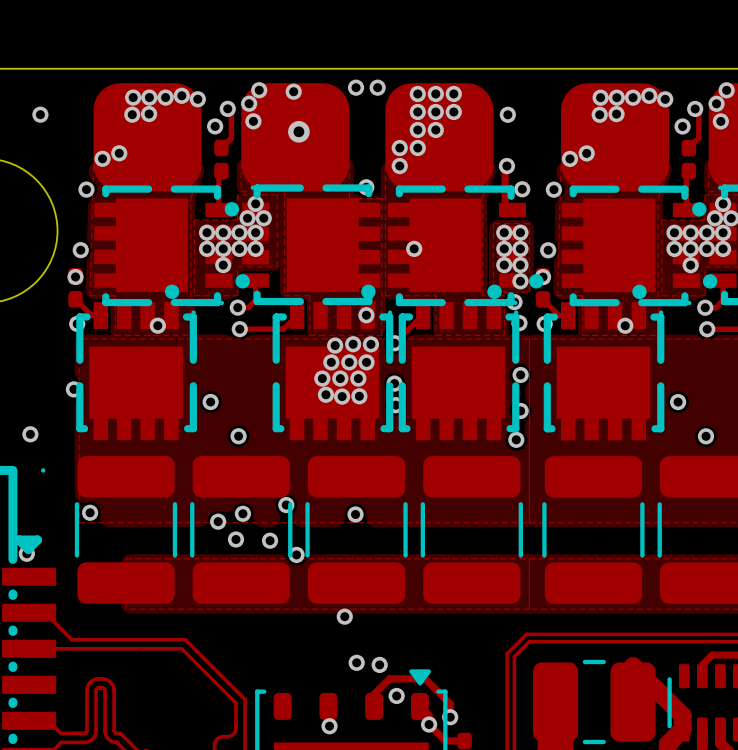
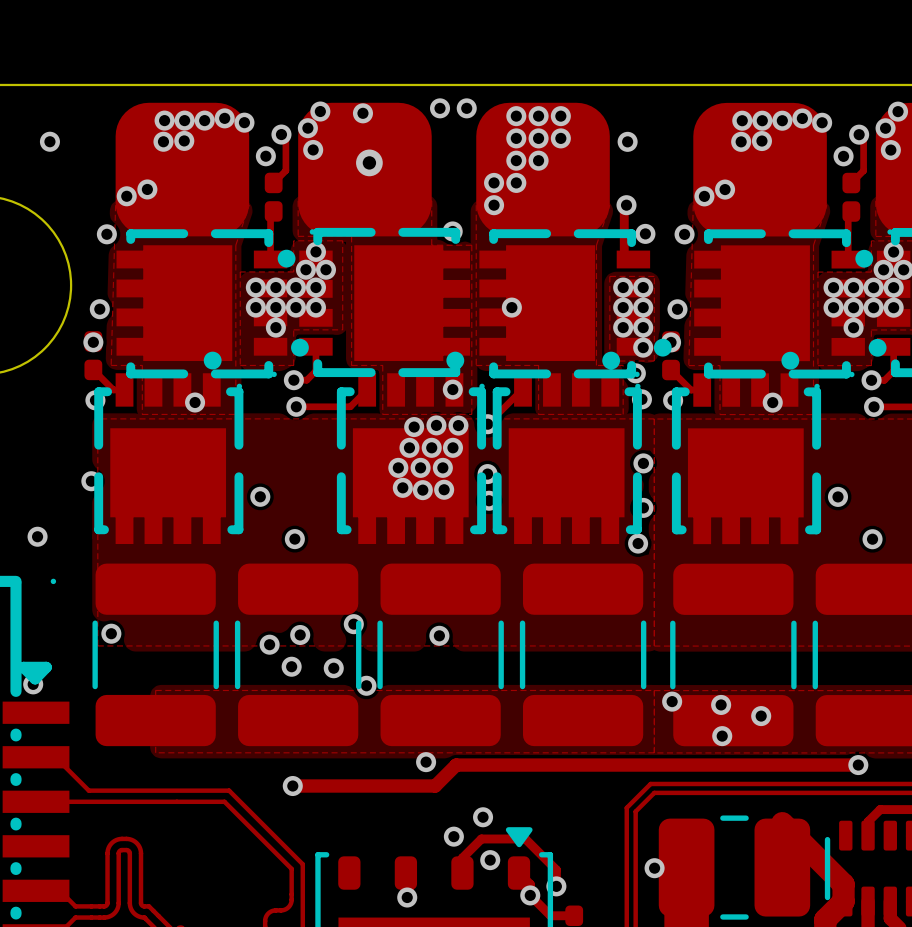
via: none -> (672, 701)
via: none -> (721, 704)
via: none -> (761, 716)
via: none -> (722, 736)
track: none -> (858, 765) (456, 765) (435, 786) (292, 786)
via: none -> (858, 765)
via: none -> (292, 786)
via: none -> (483, 817)
via: (356, 662) -> none
via: (379, 664) -> none
via: none -> (453, 836)
via: none -> (654, 868)

